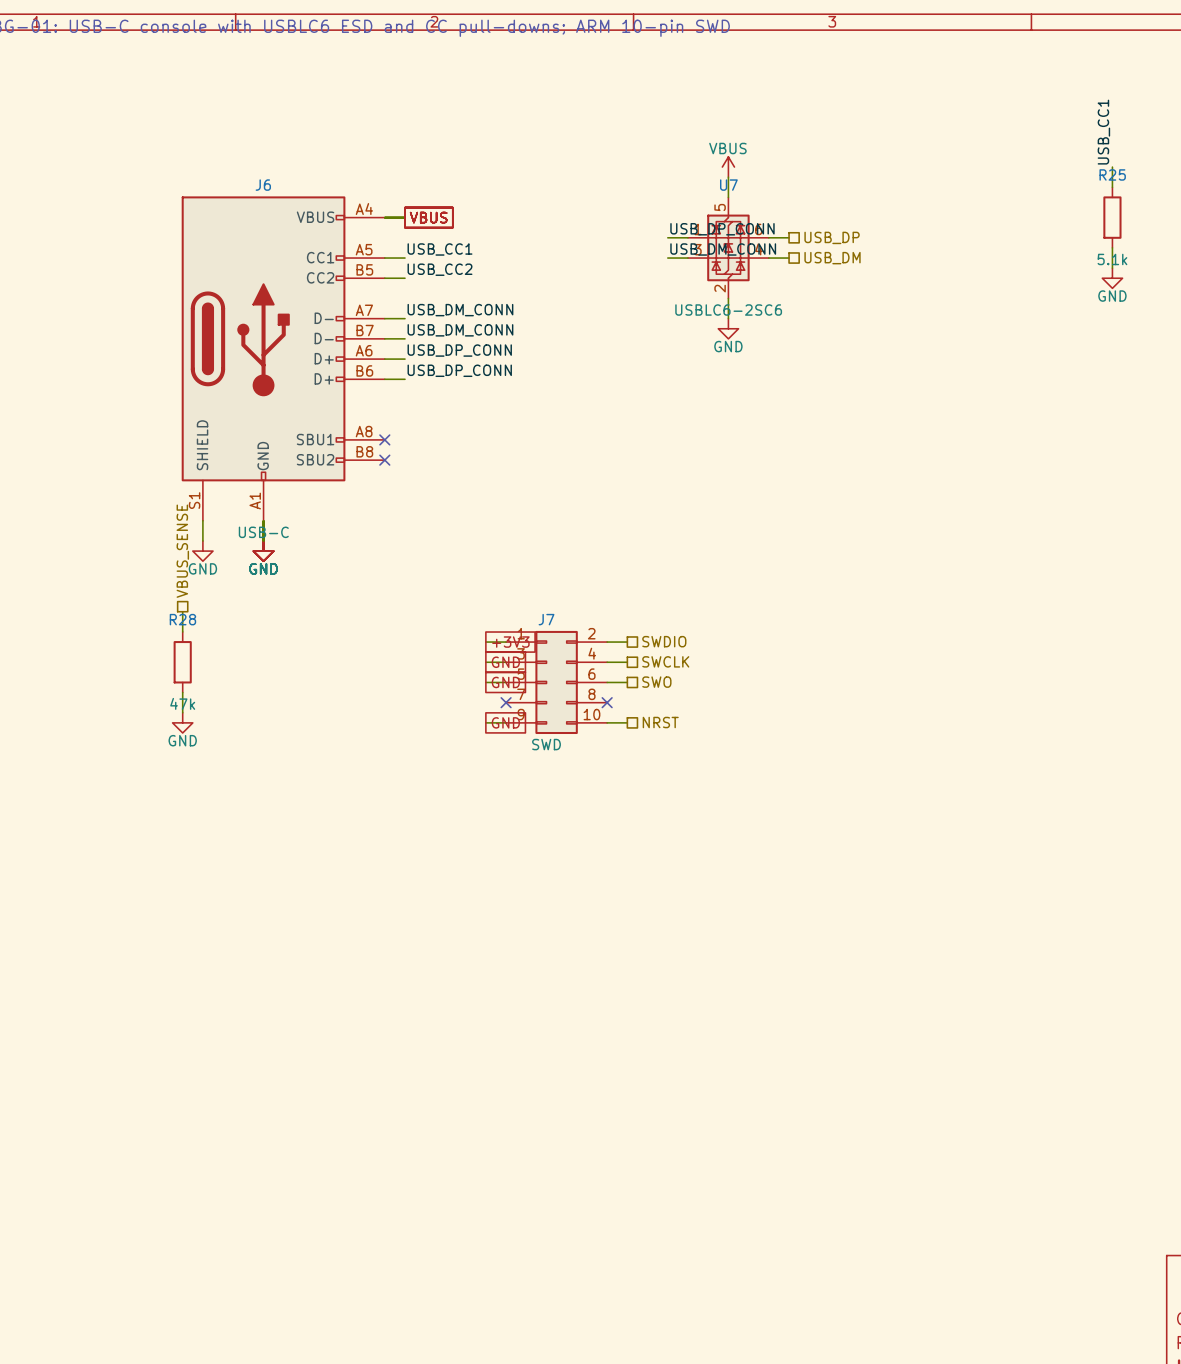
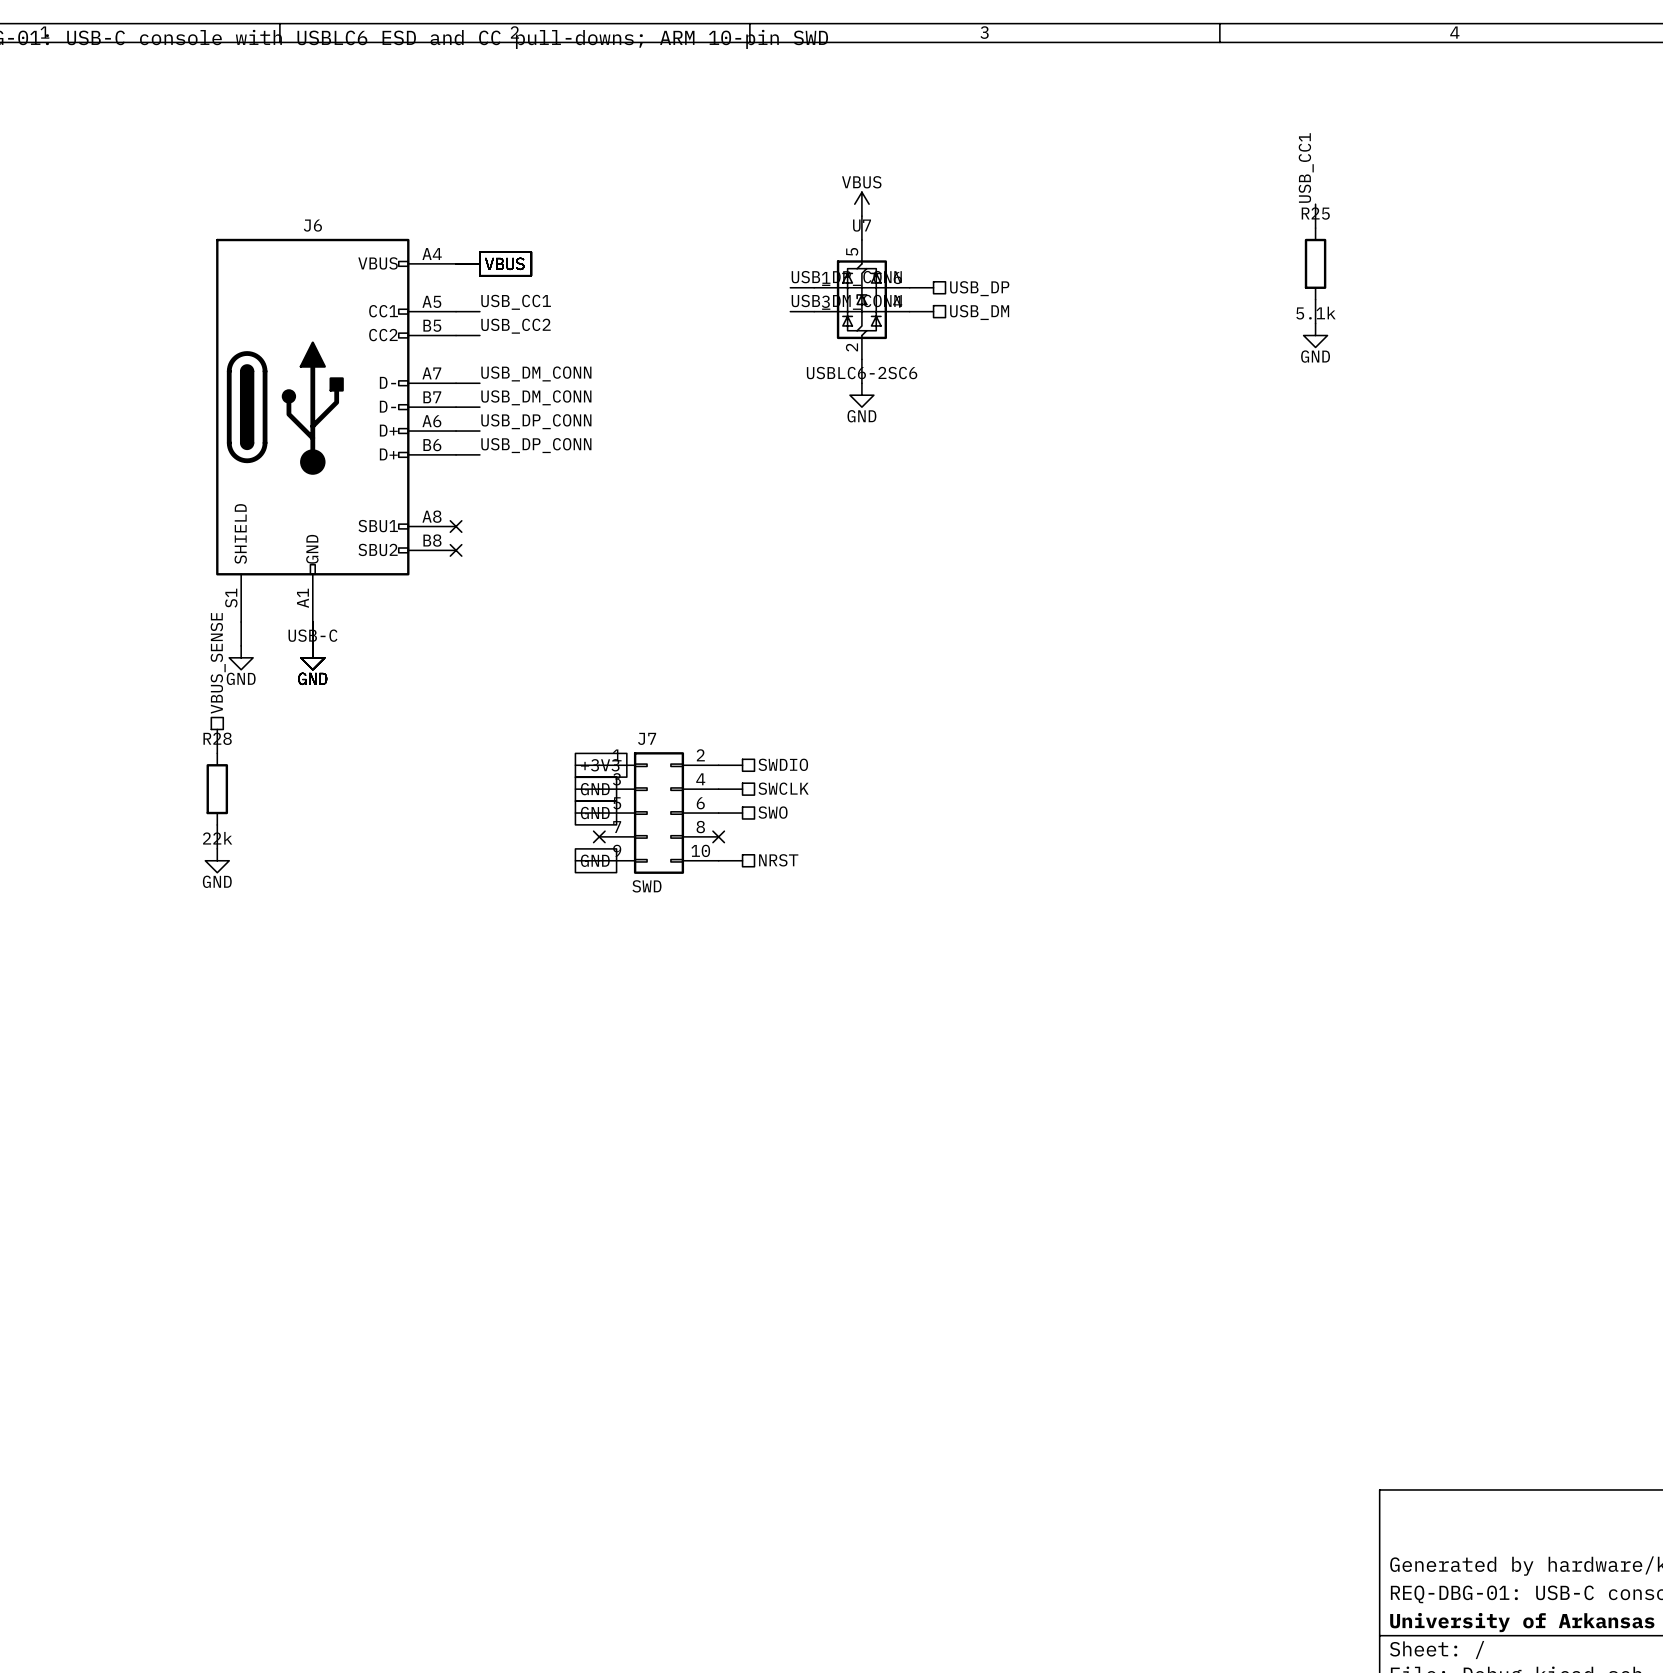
R28 value: 47k (182, 703) -> 22k (217, 838)

